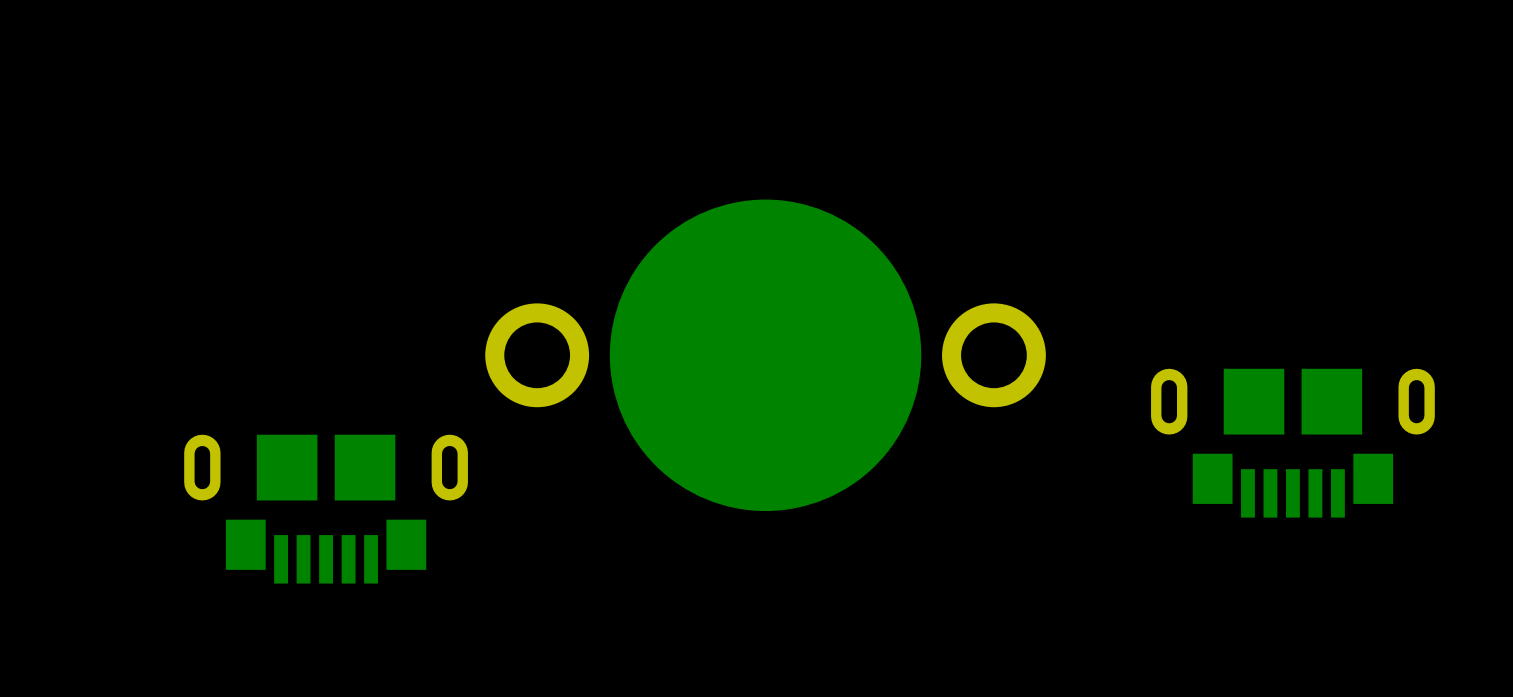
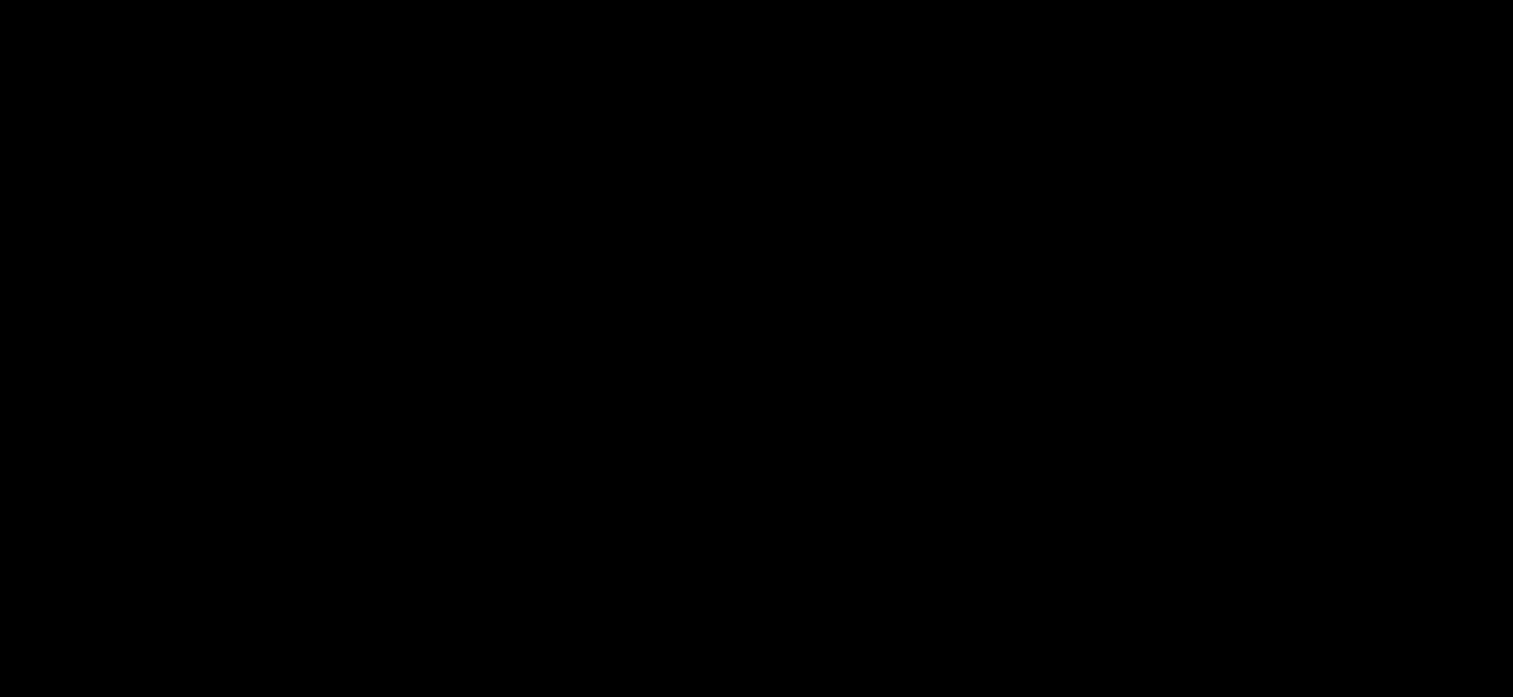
part: (765, 355) -> none
part: (1292, 443) -> none
part: (326, 509) -> none

